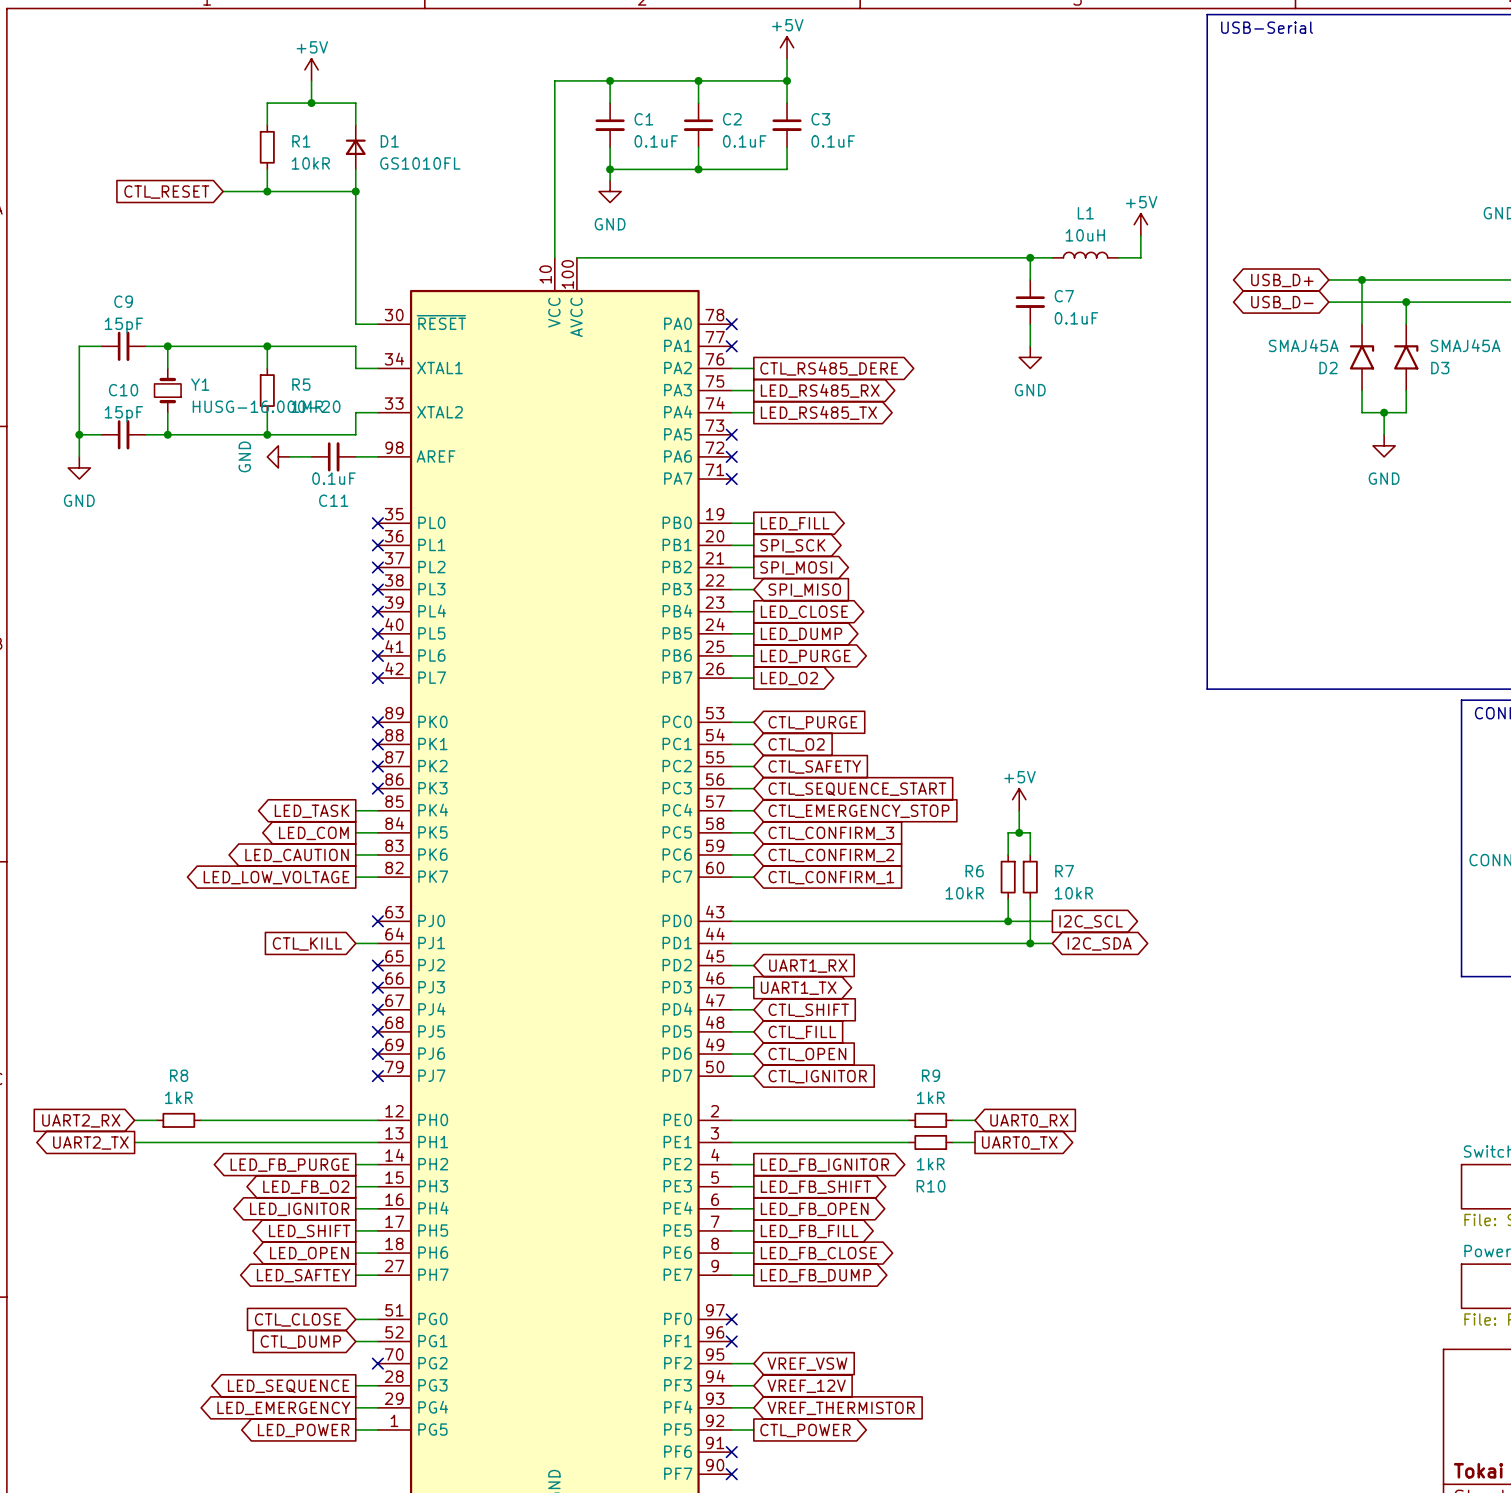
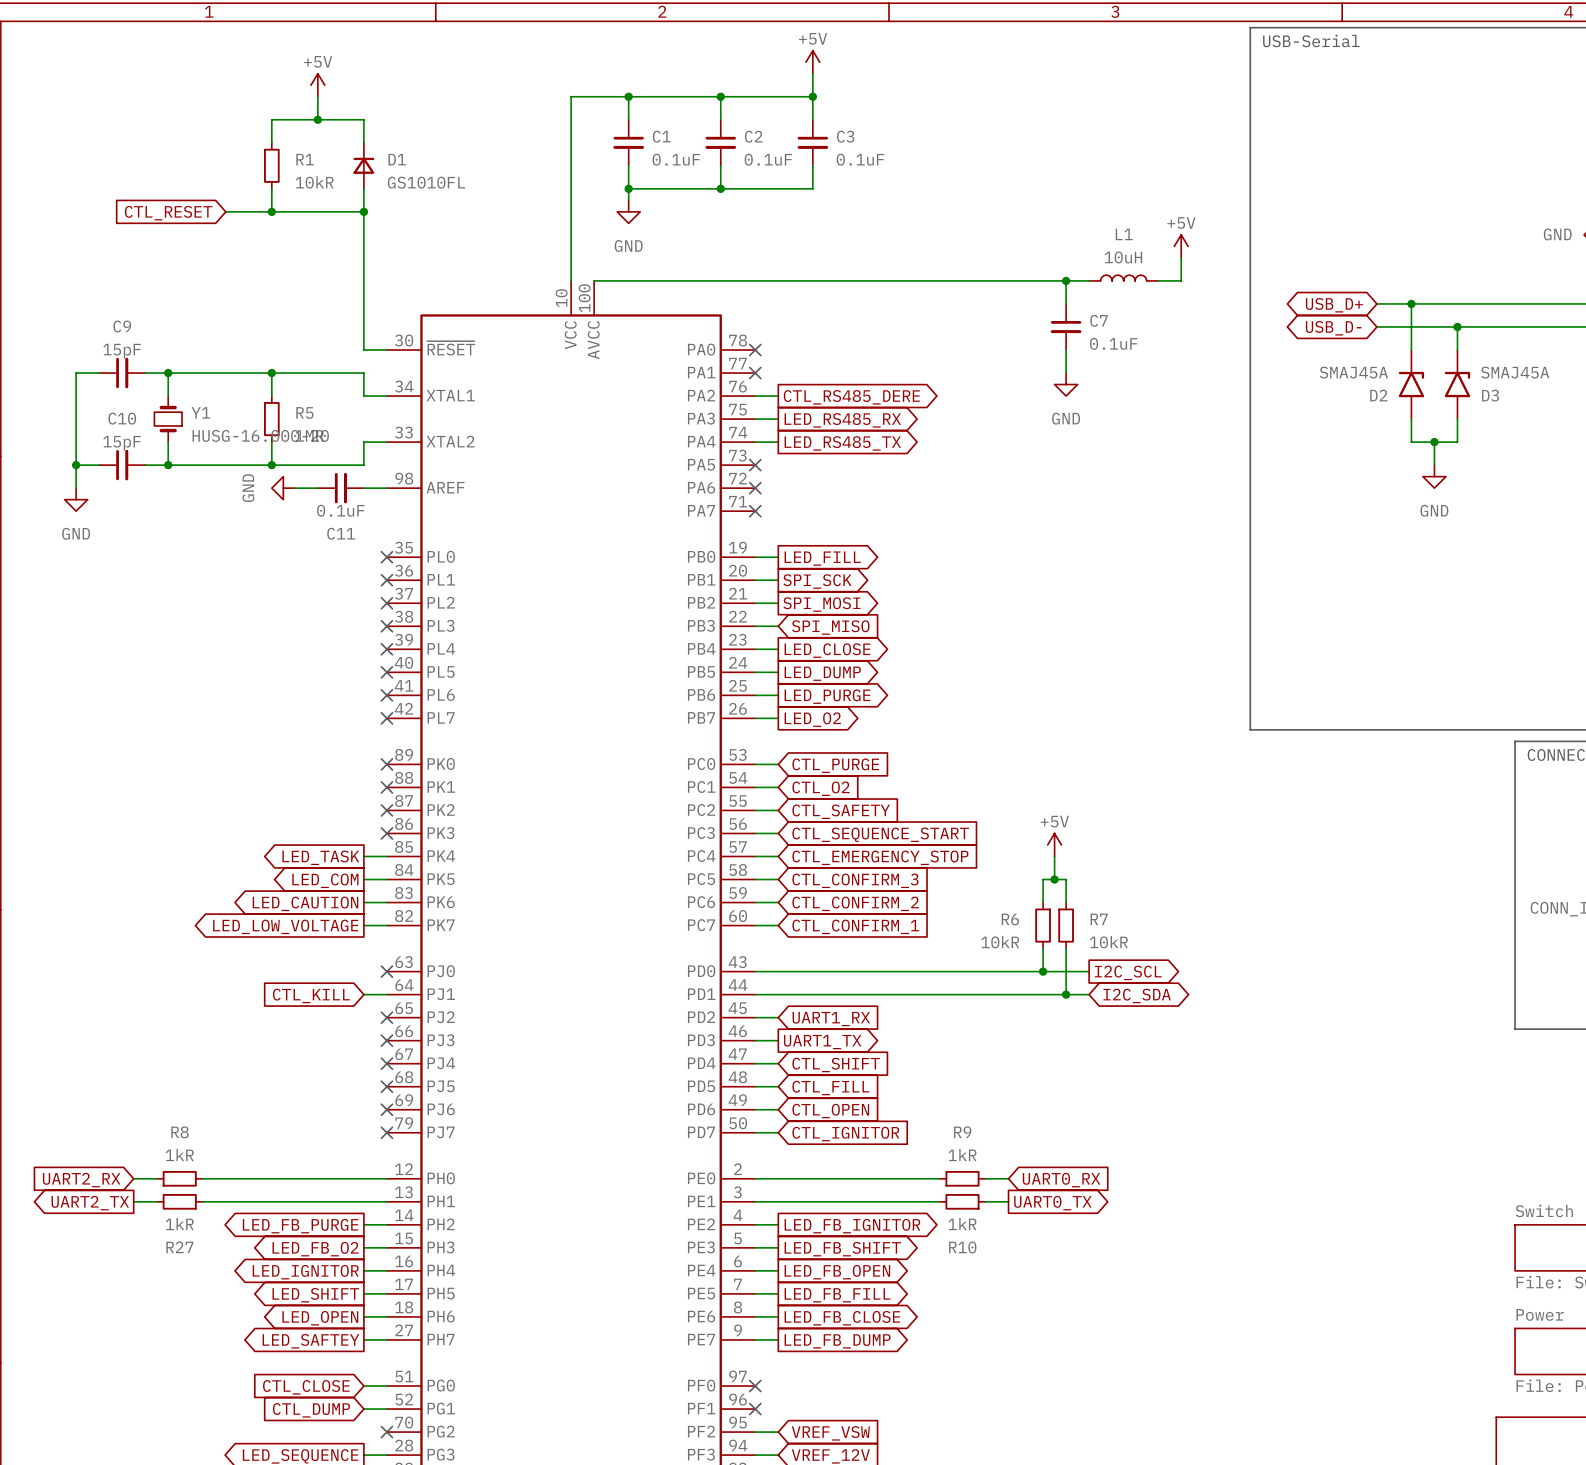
wire: (156, 1142) (200, 1142) -> none
R27: none -> 1kR (179, 1201)

